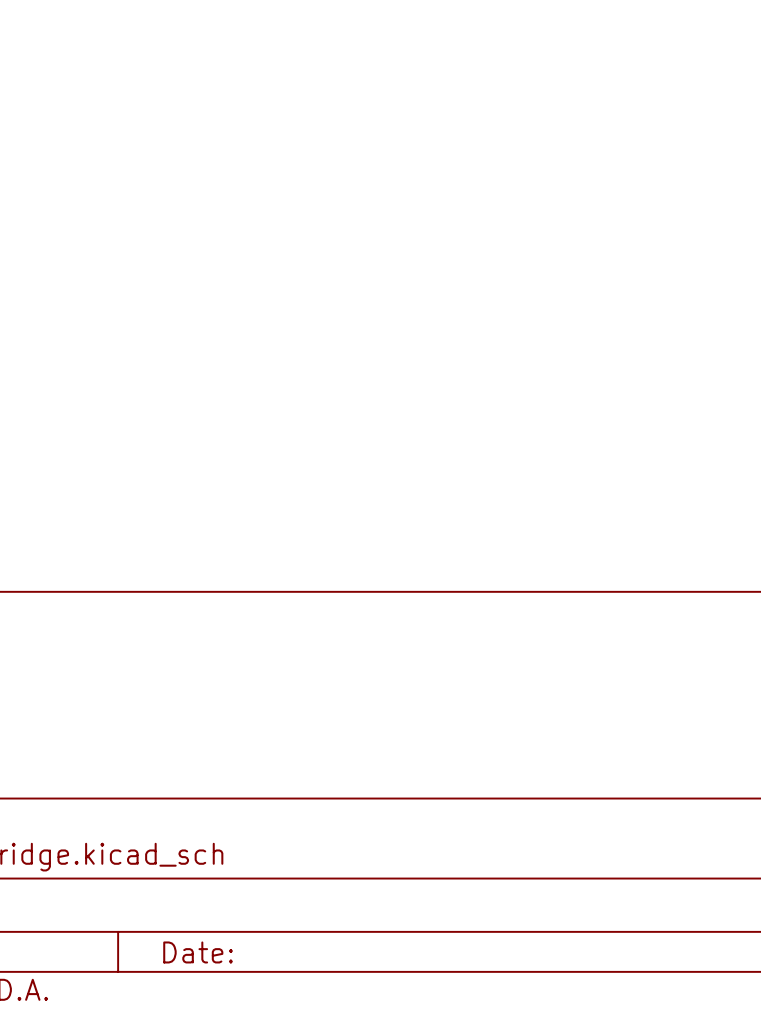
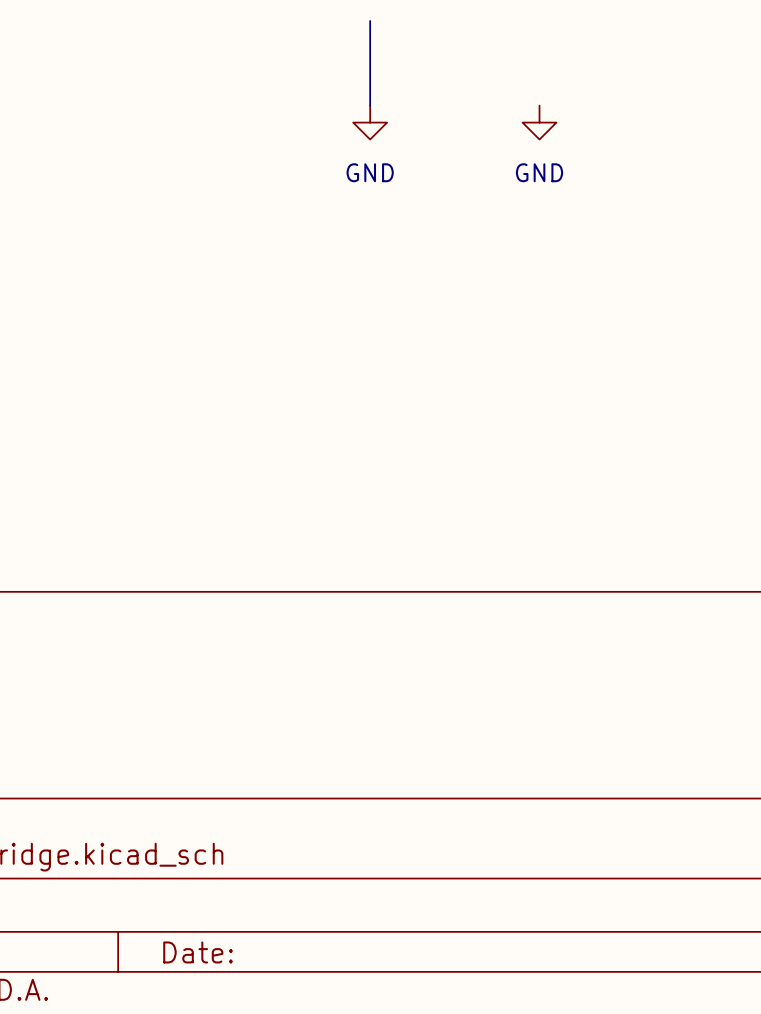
wire: none -> (370, 20) (370, 105)
power symbol: none -> GND (370, 122)
power symbol: none -> GND (539, 122)

